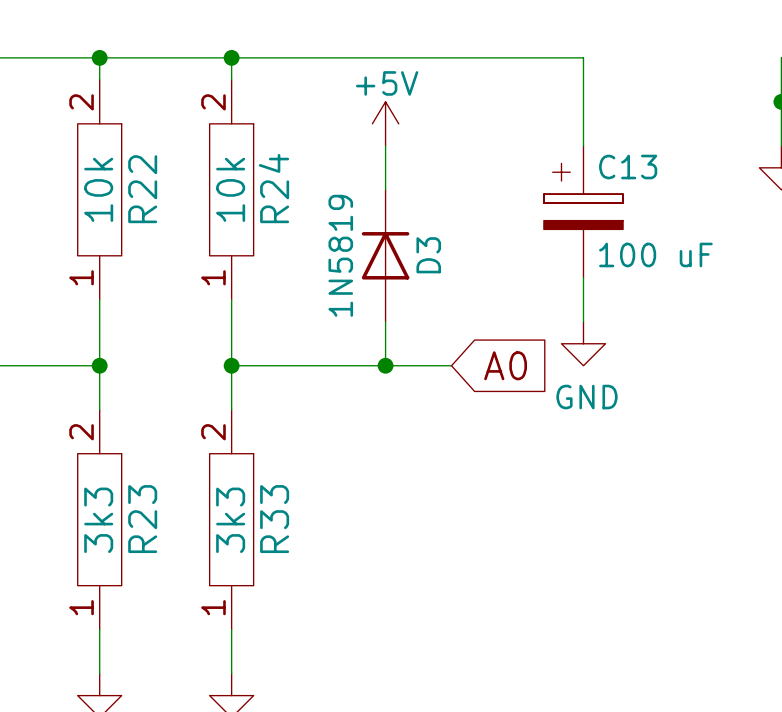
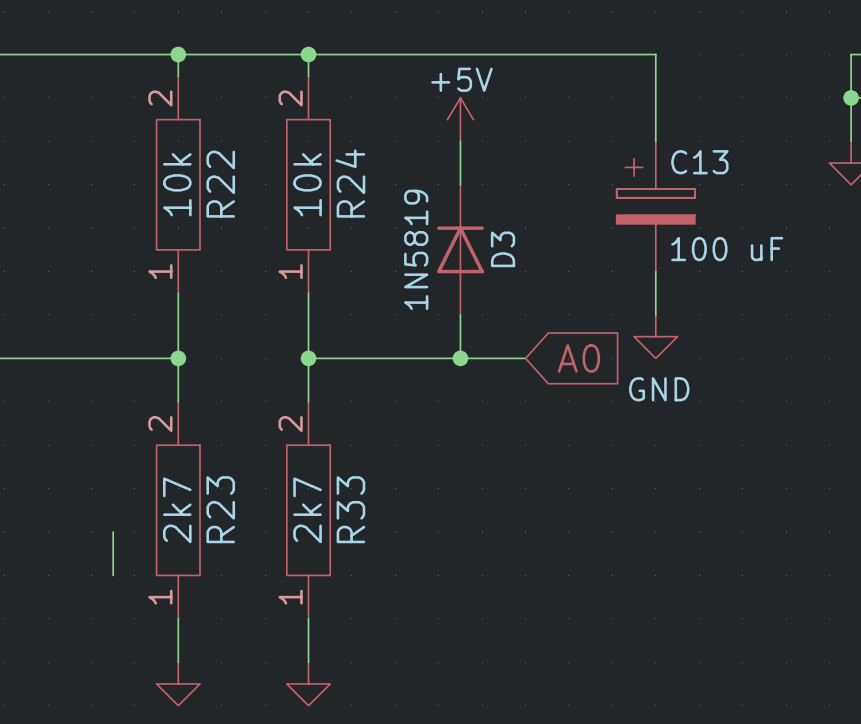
R23 value: 3k3 (98, 520) -> 2k7 (177, 510)
R33 value: 3k3 (230, 520) -> 2k7 (307, 510)
wire: none -> (113, 532) (113, 575)

